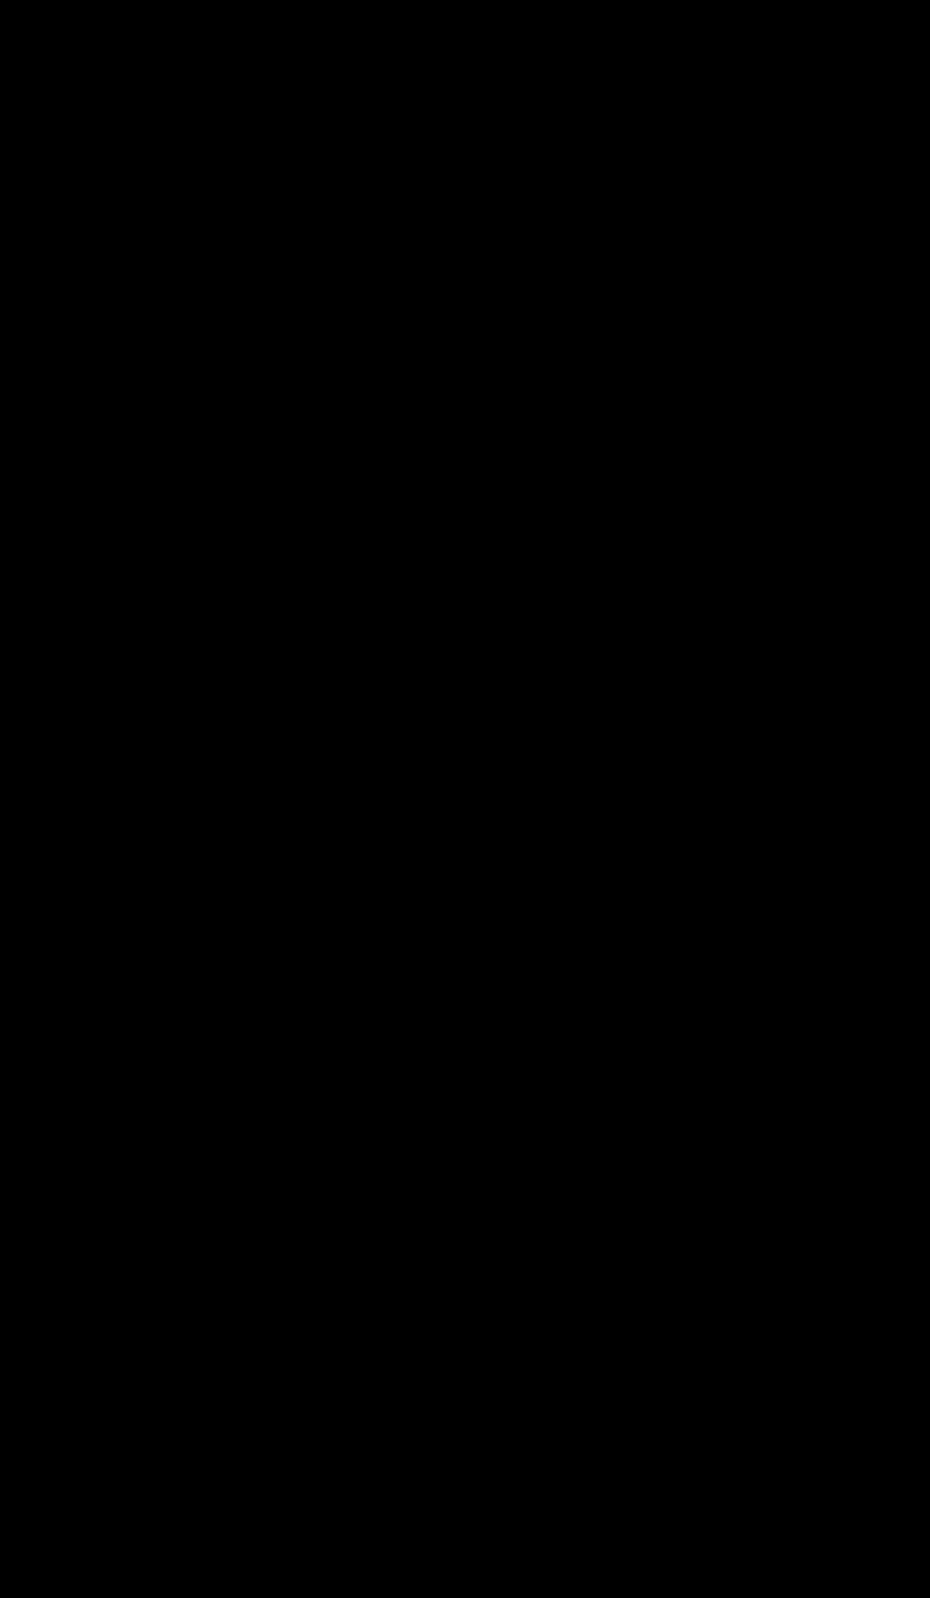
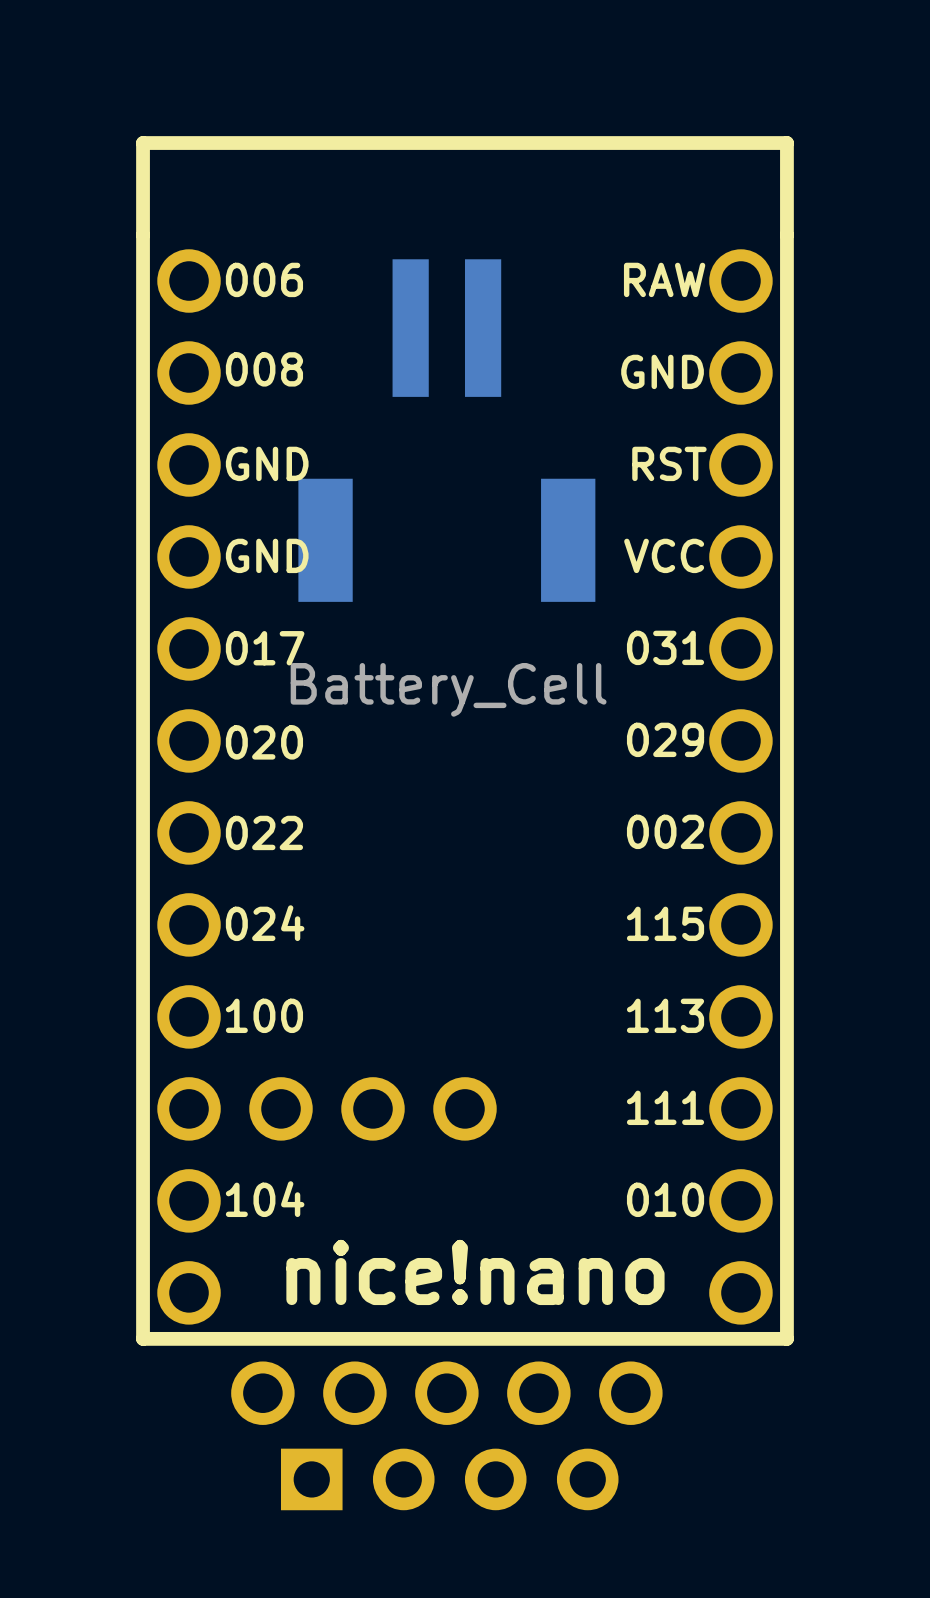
part: none -> Battery_Cell (446, 430)
part: none -> (464, 740)
part: none -> (446, 1393)
part: none -> (449, 1479)

